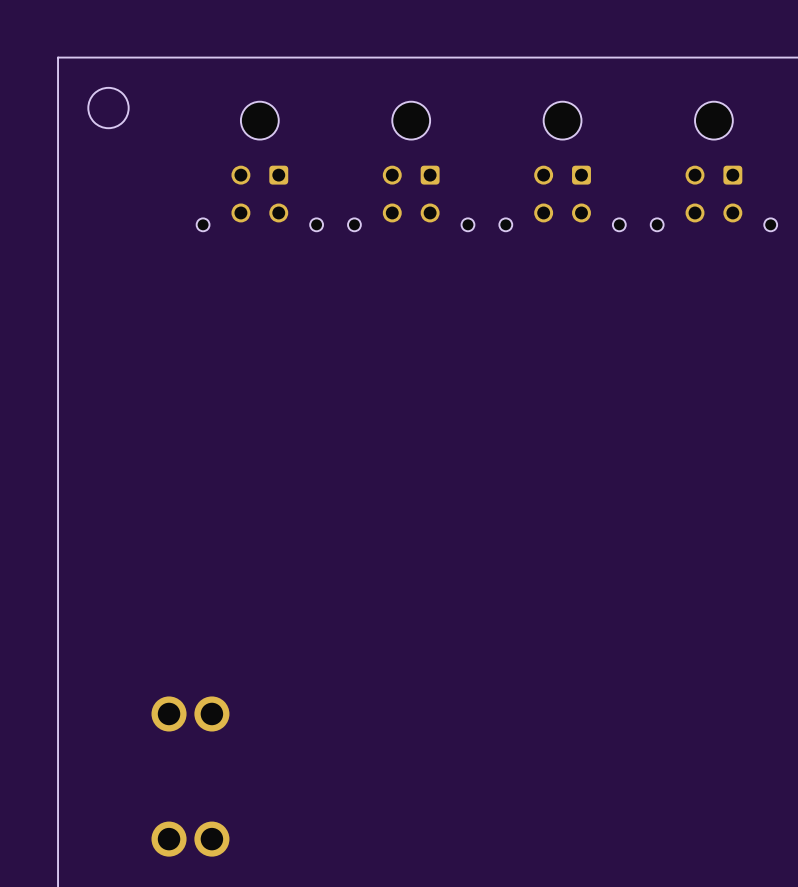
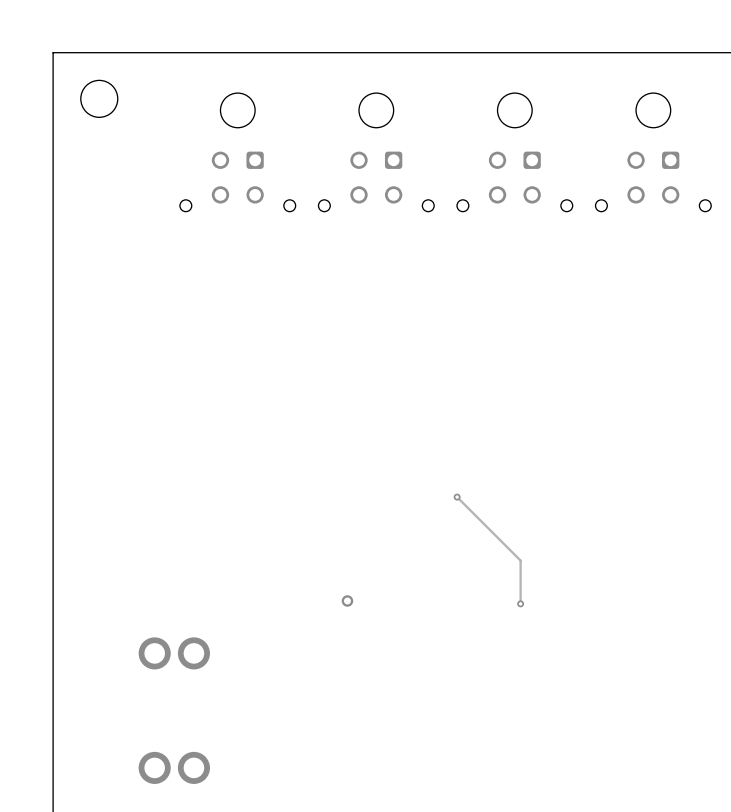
track: none -> (457, 497) (520, 560) (520, 603)
via: none -> (457, 497)
via: none -> (347, 600)
via: none -> (520, 603)

